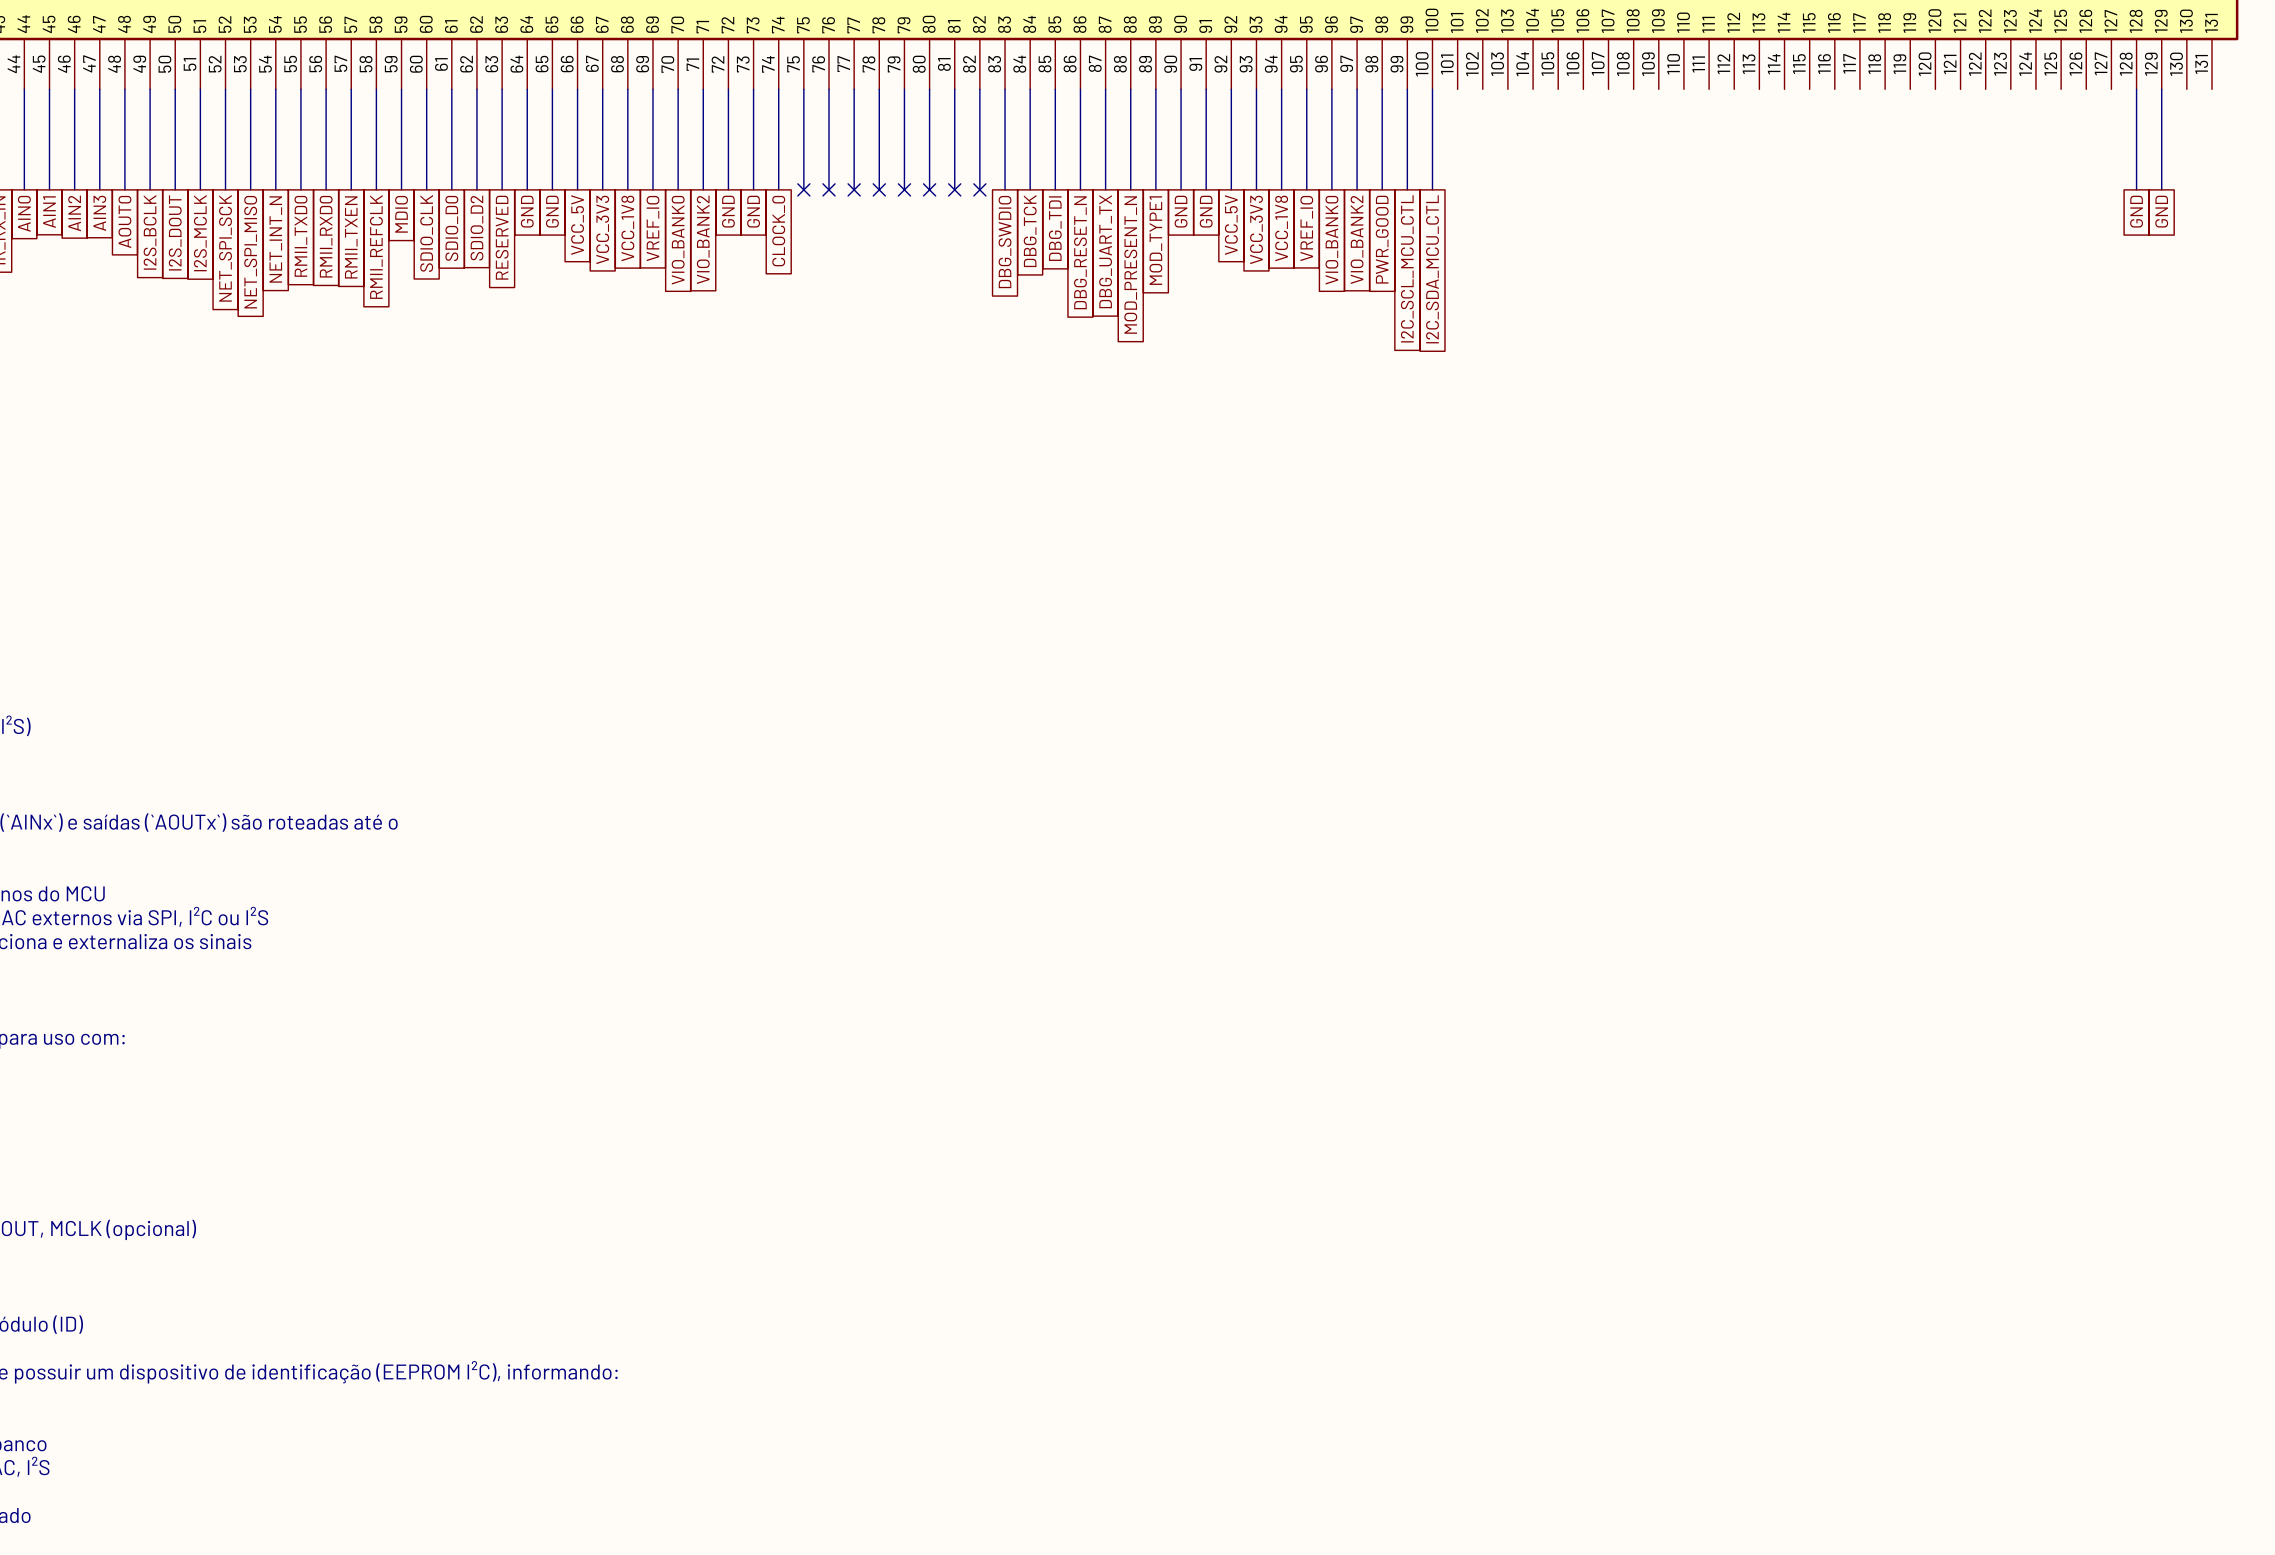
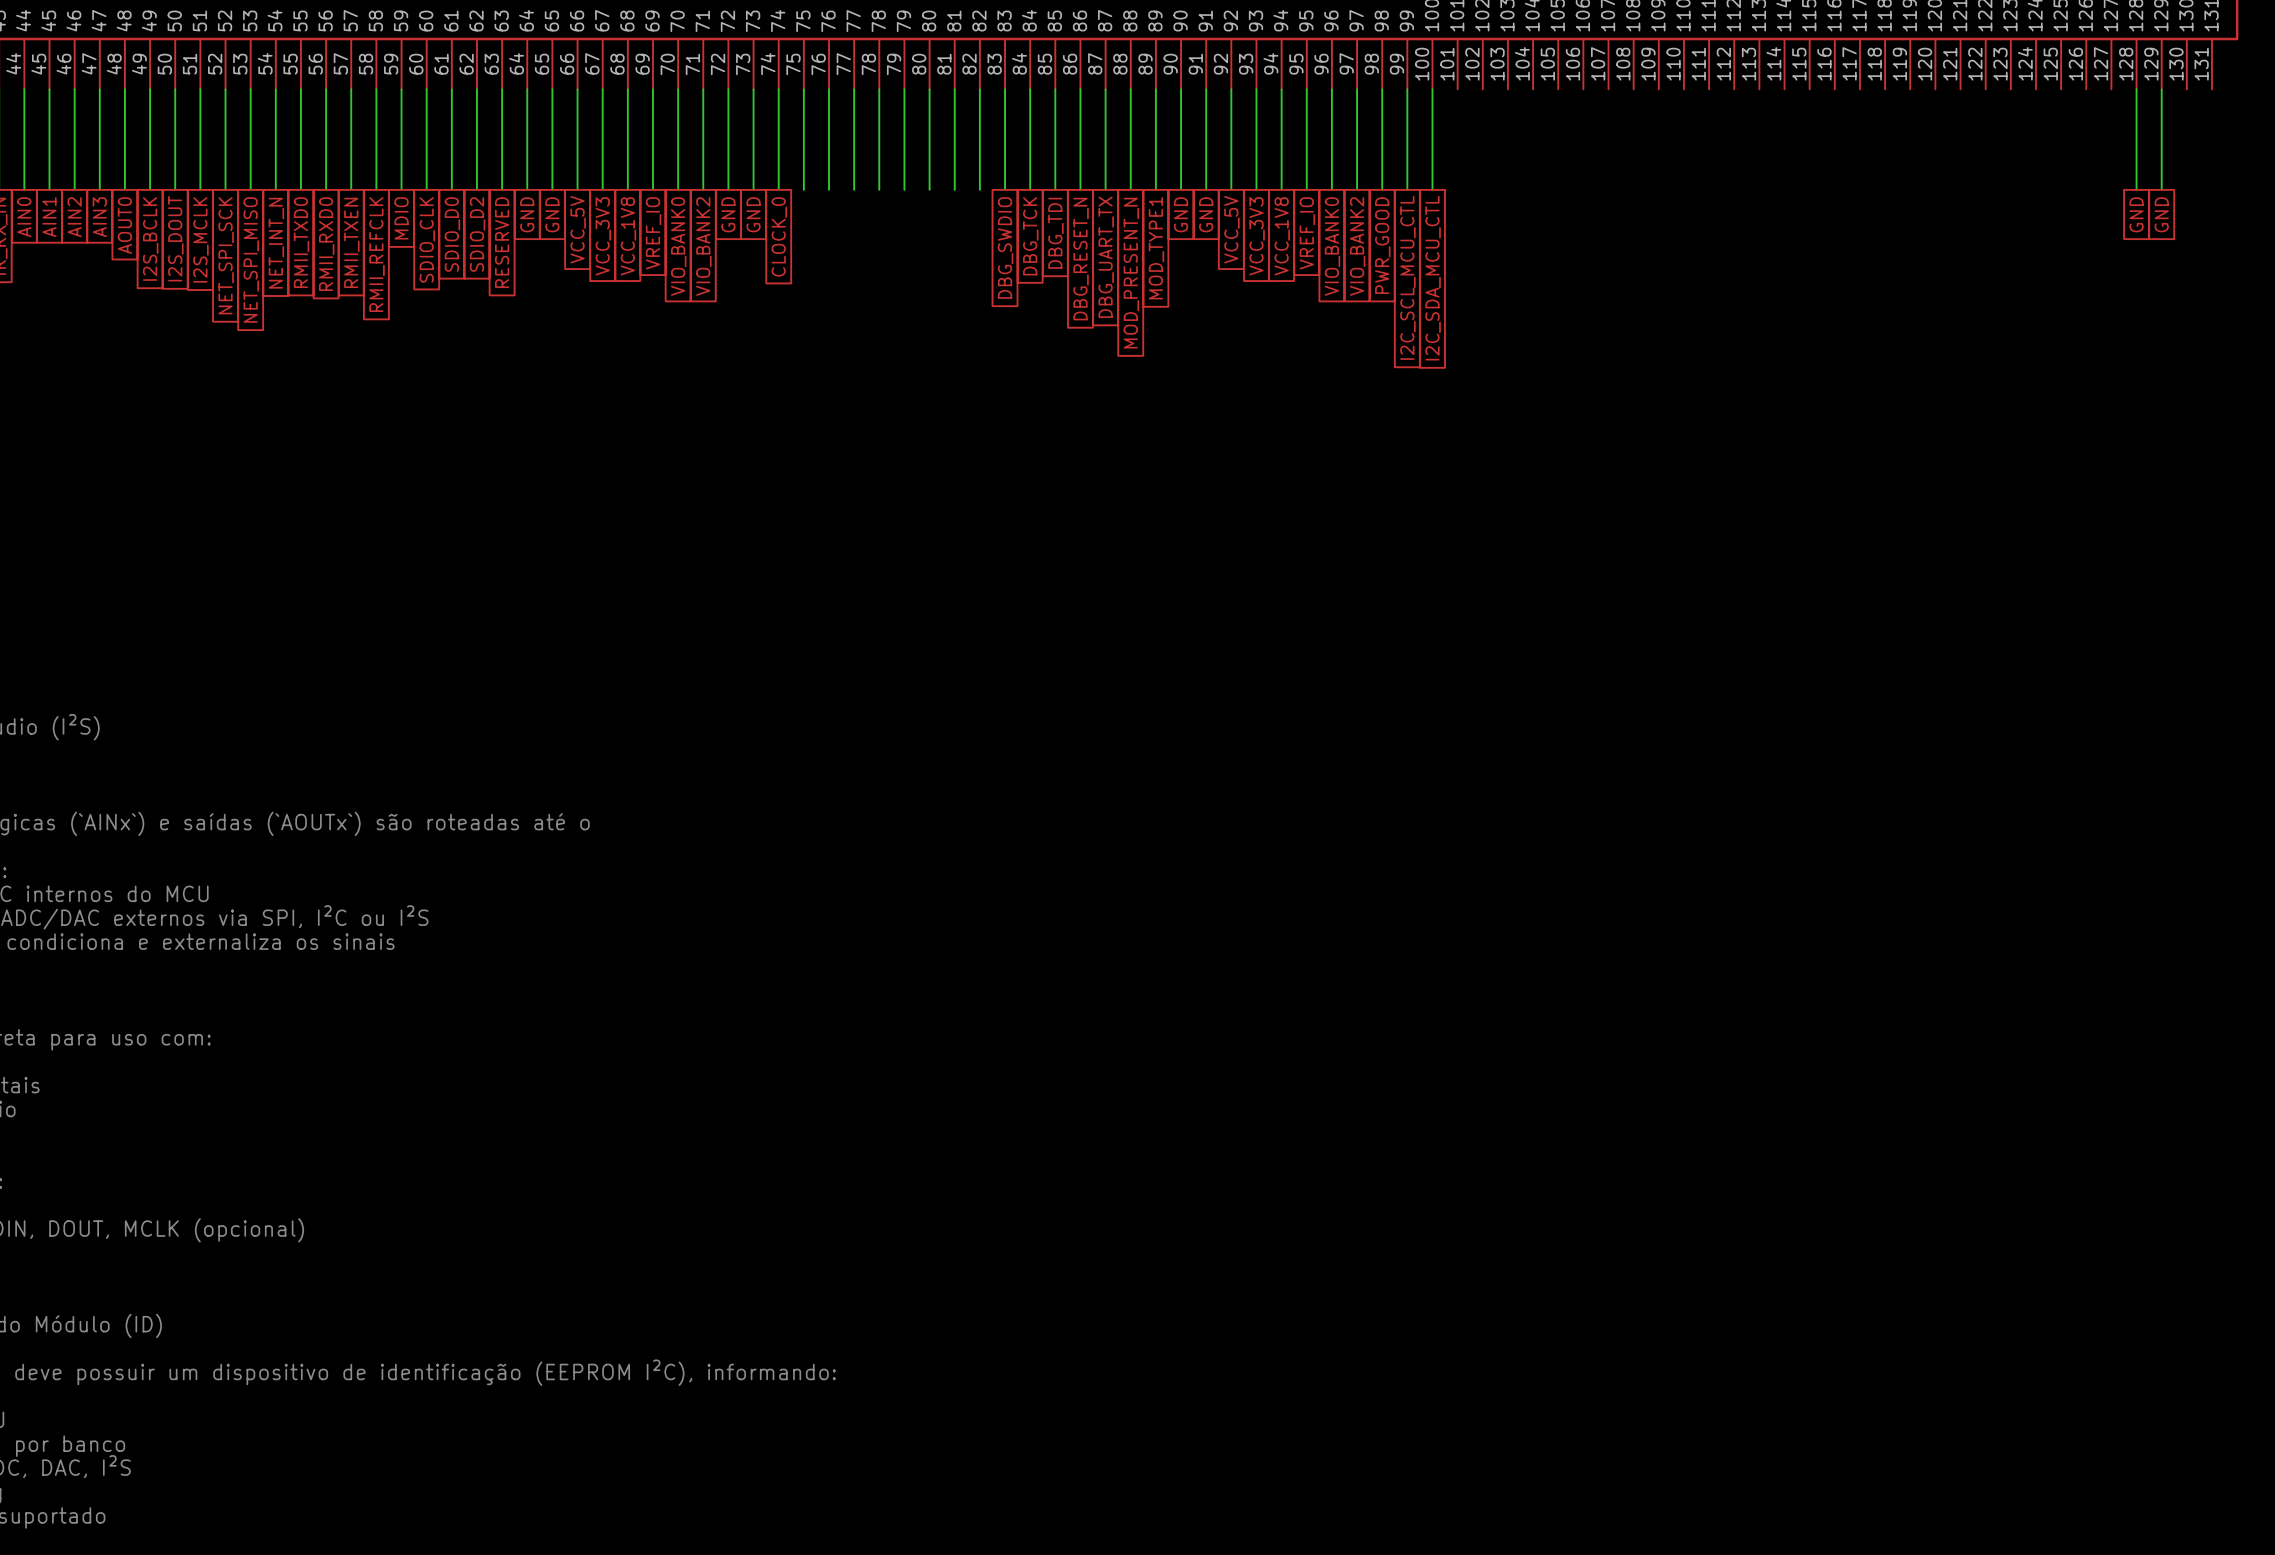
no-connect mark: (803, 189) -> none
no-connect mark: (829, 189) -> none
no-connect mark: (854, 189) -> none
no-connect mark: (879, 189) -> none
no-connect mark: (904, 189) -> none
no-connect mark: (929, 189) -> none
no-connect mark: (954, 189) -> none
no-connect mark: (979, 189) -> none

